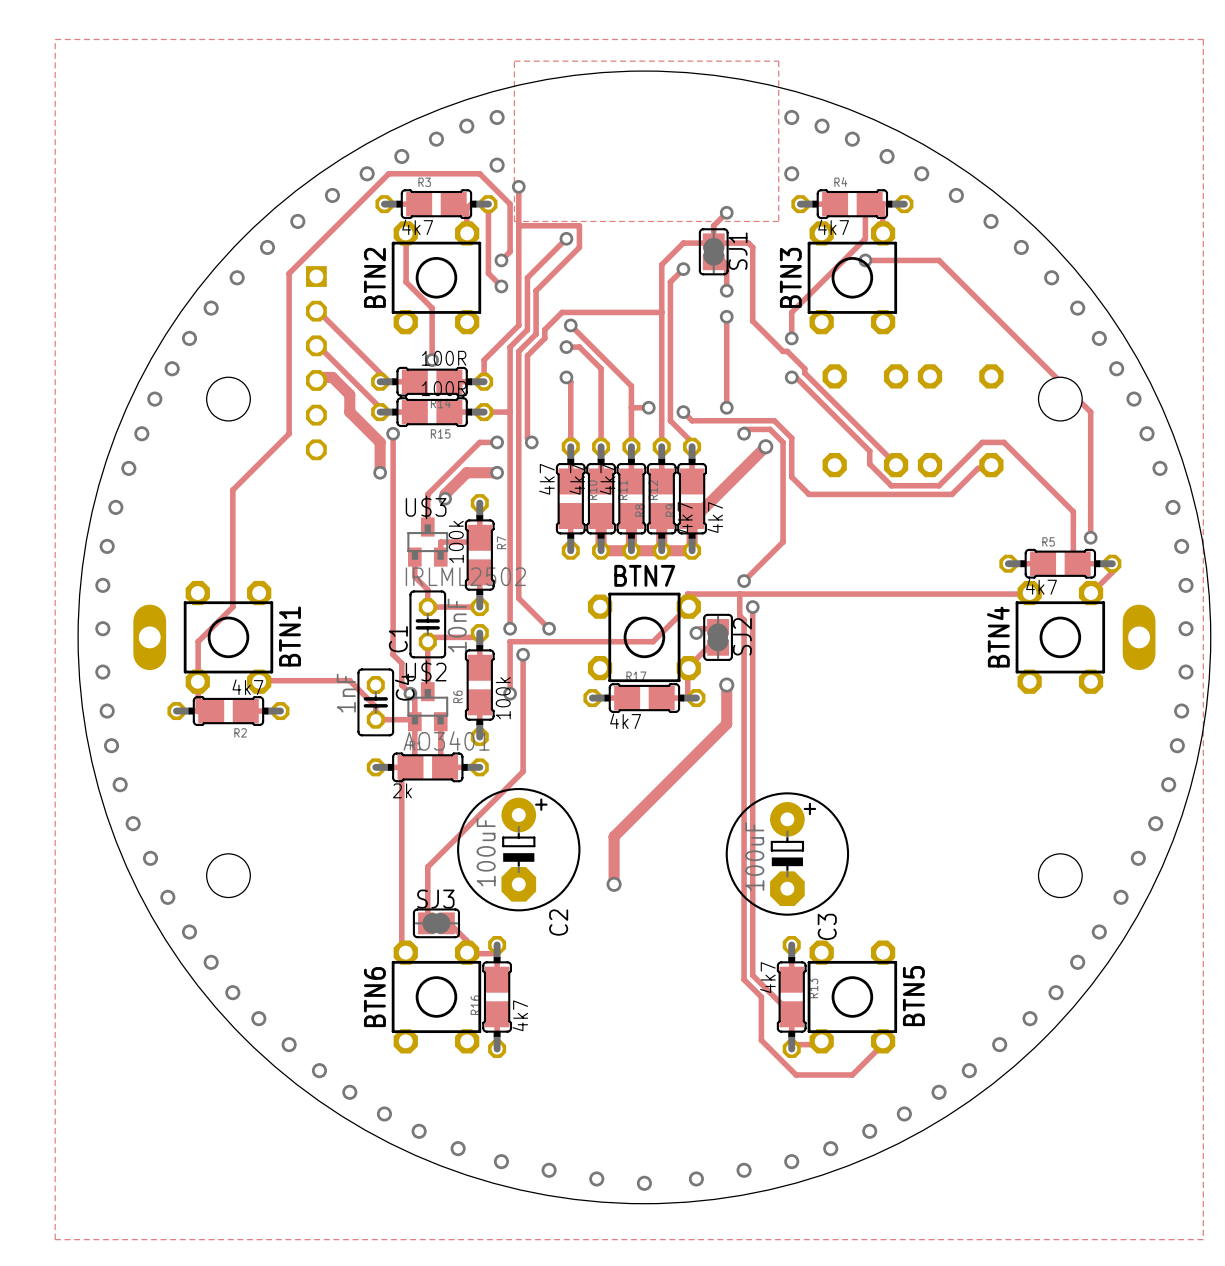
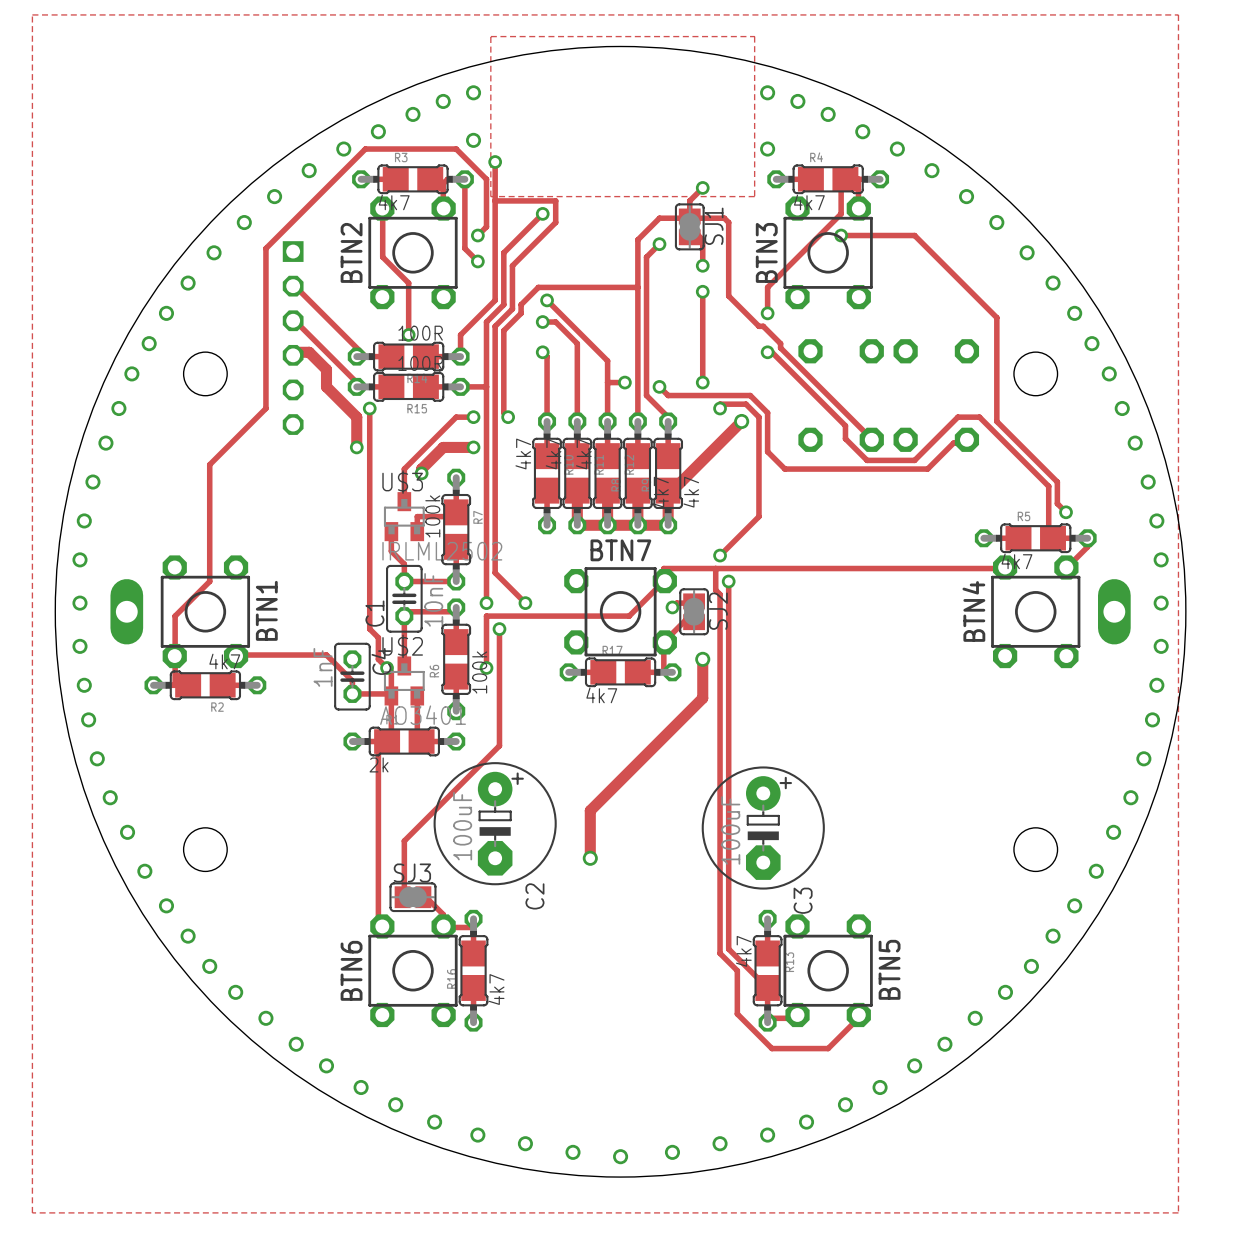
track: (1021, 342) (1090, 412) (1090, 537) -> (996, 317) (996, 421) (1057, 482) (1057, 503) (1066, 512)

